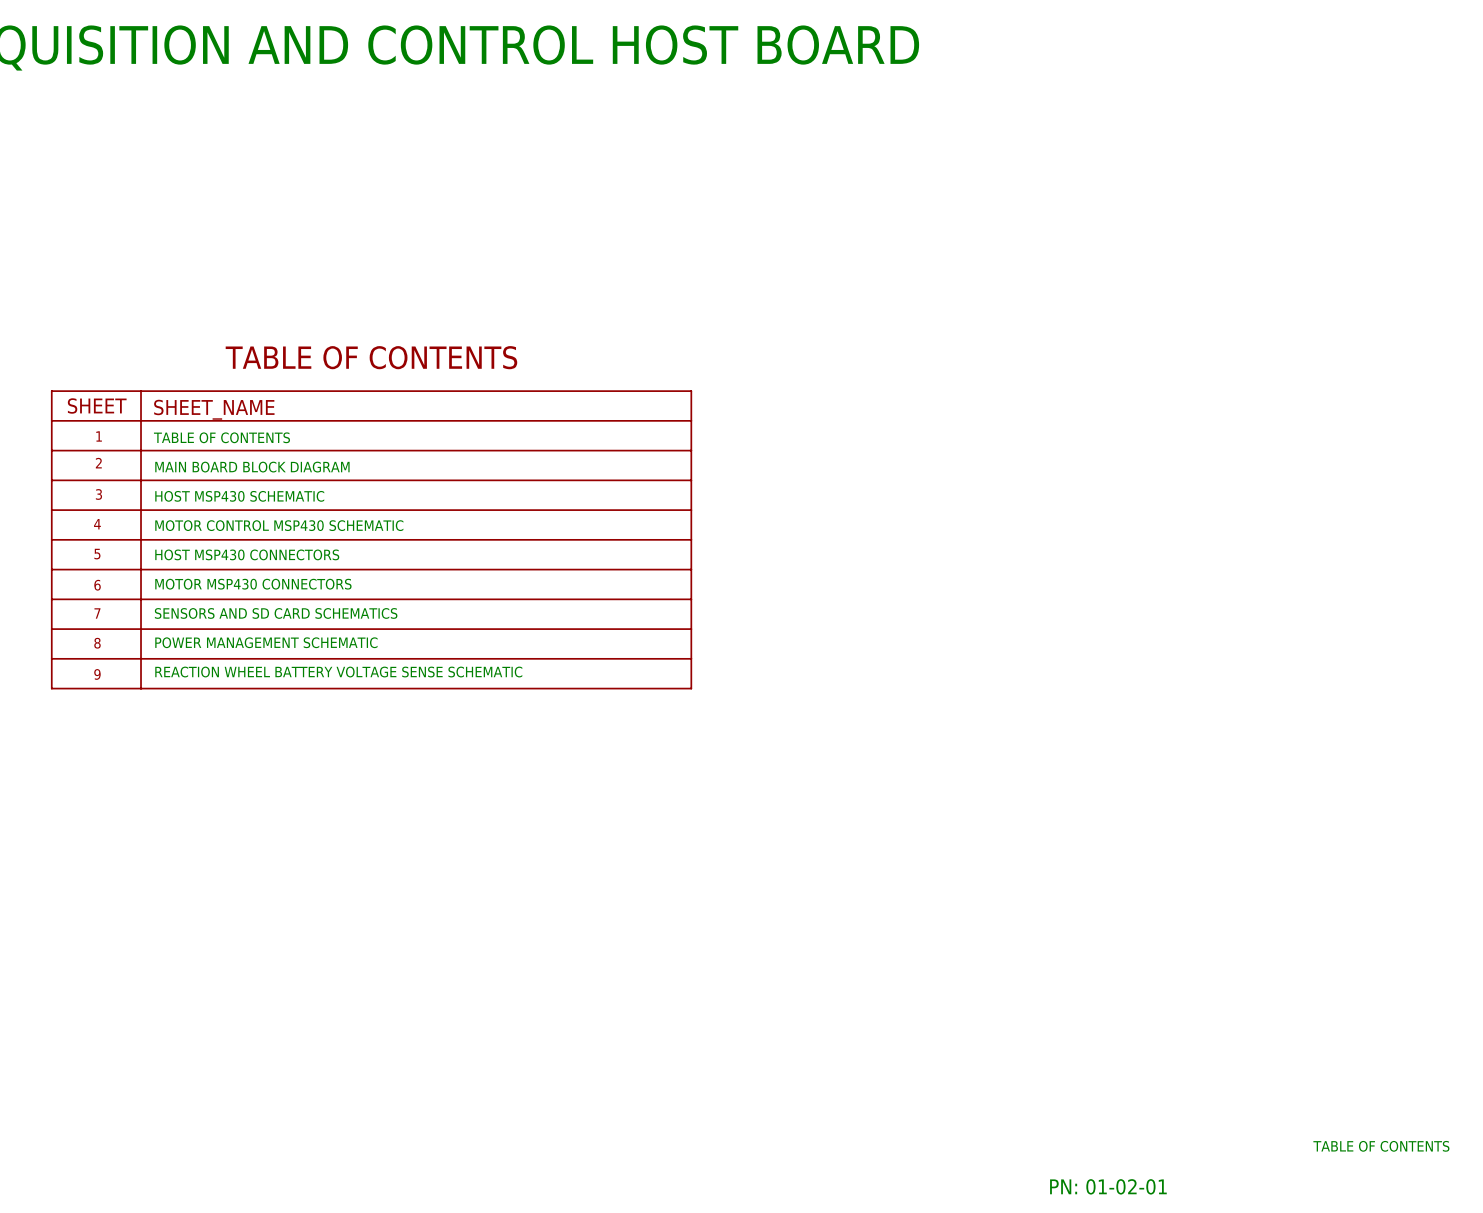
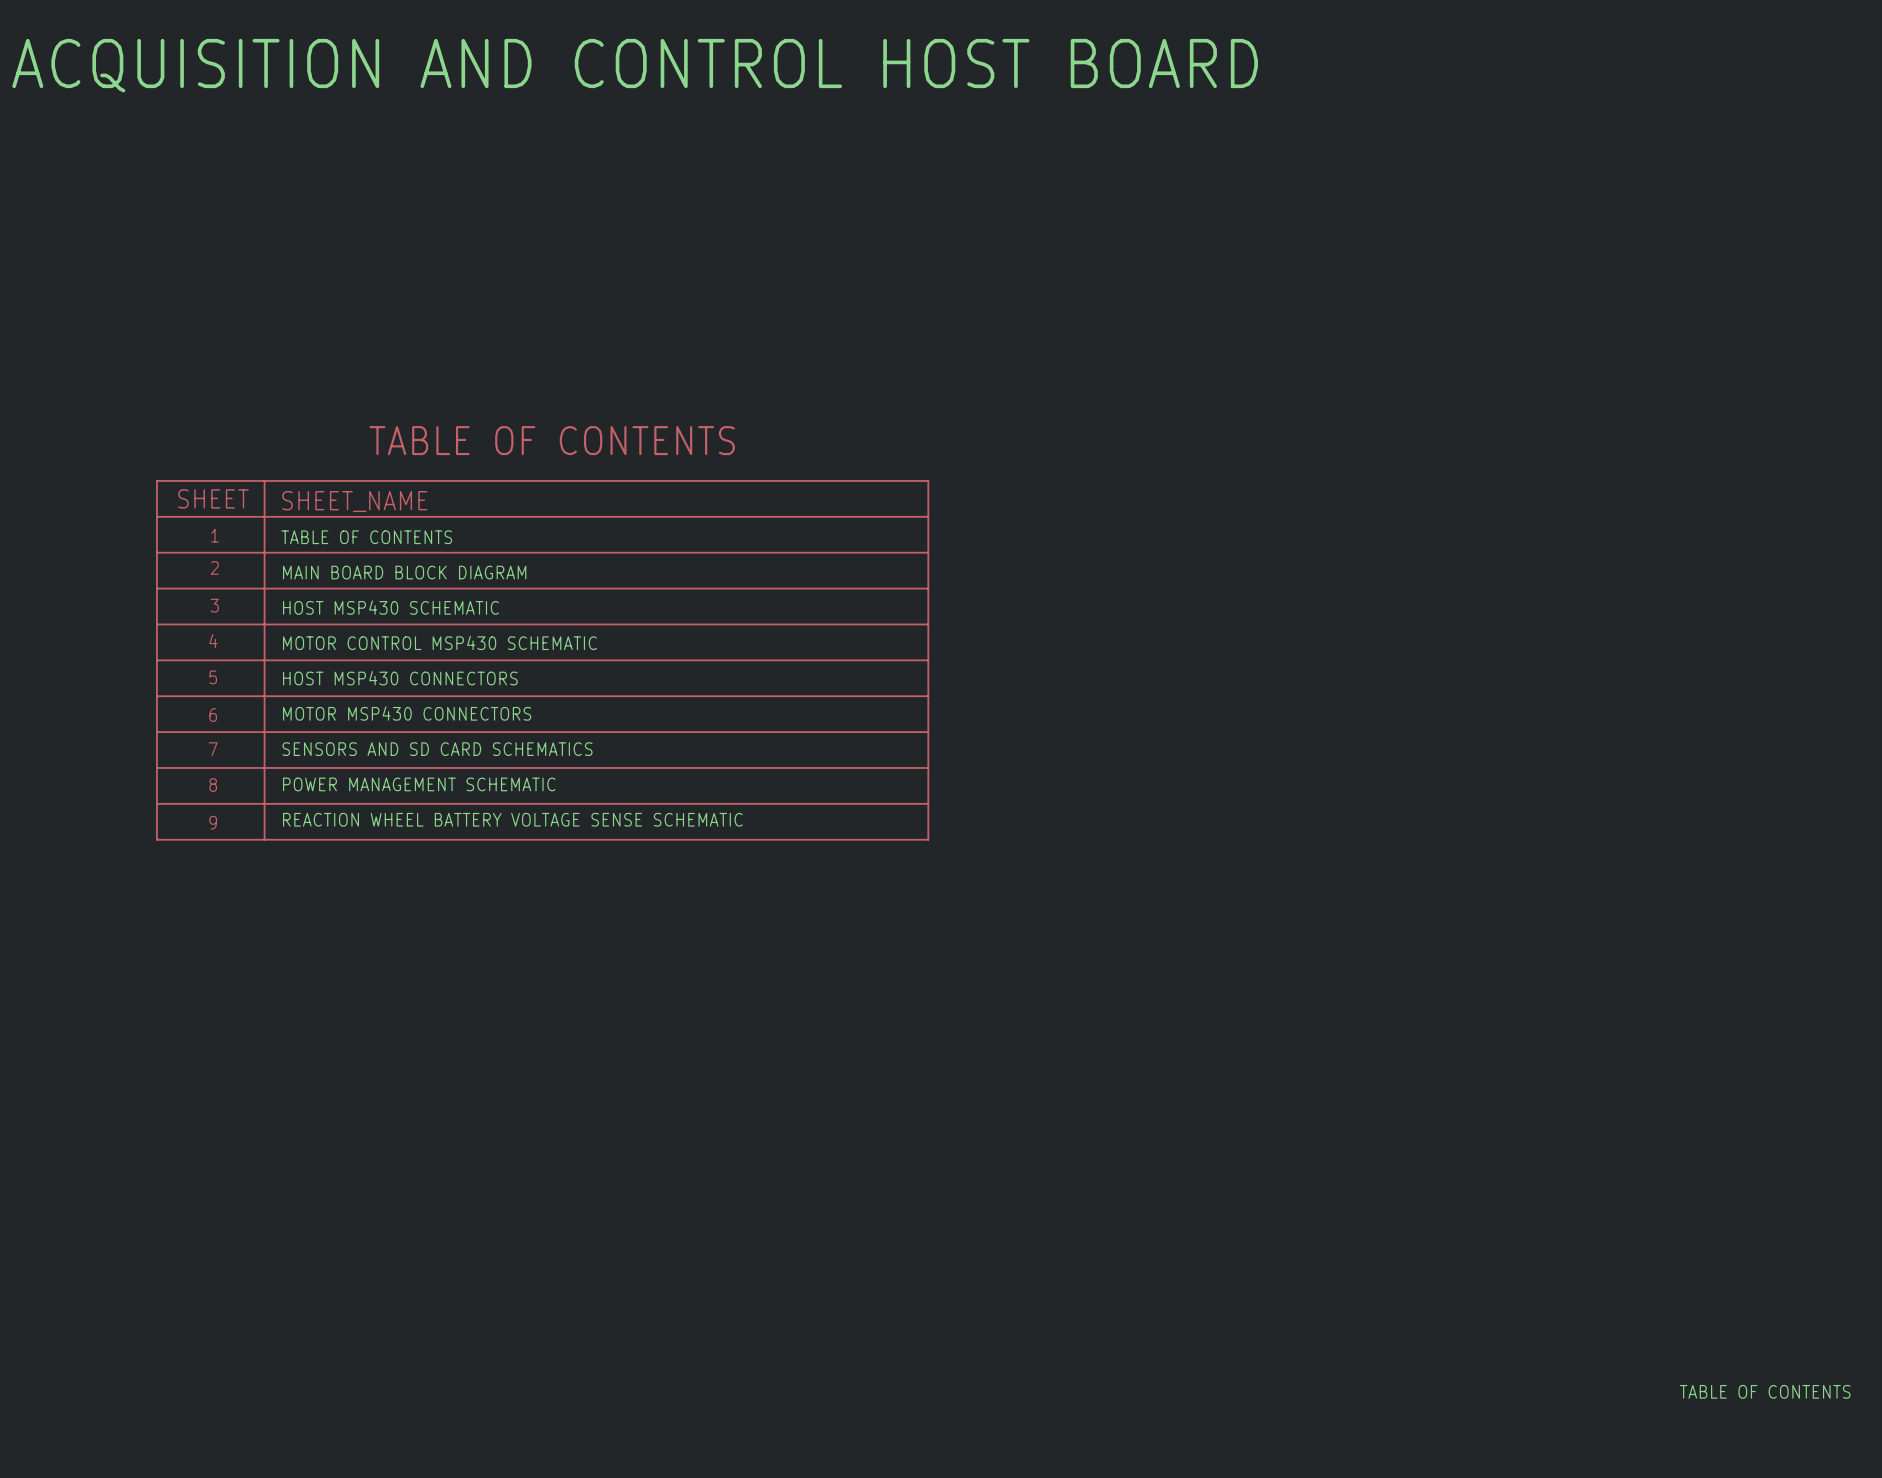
text: PN: 01-02-01 (1108, 1186) -> none

